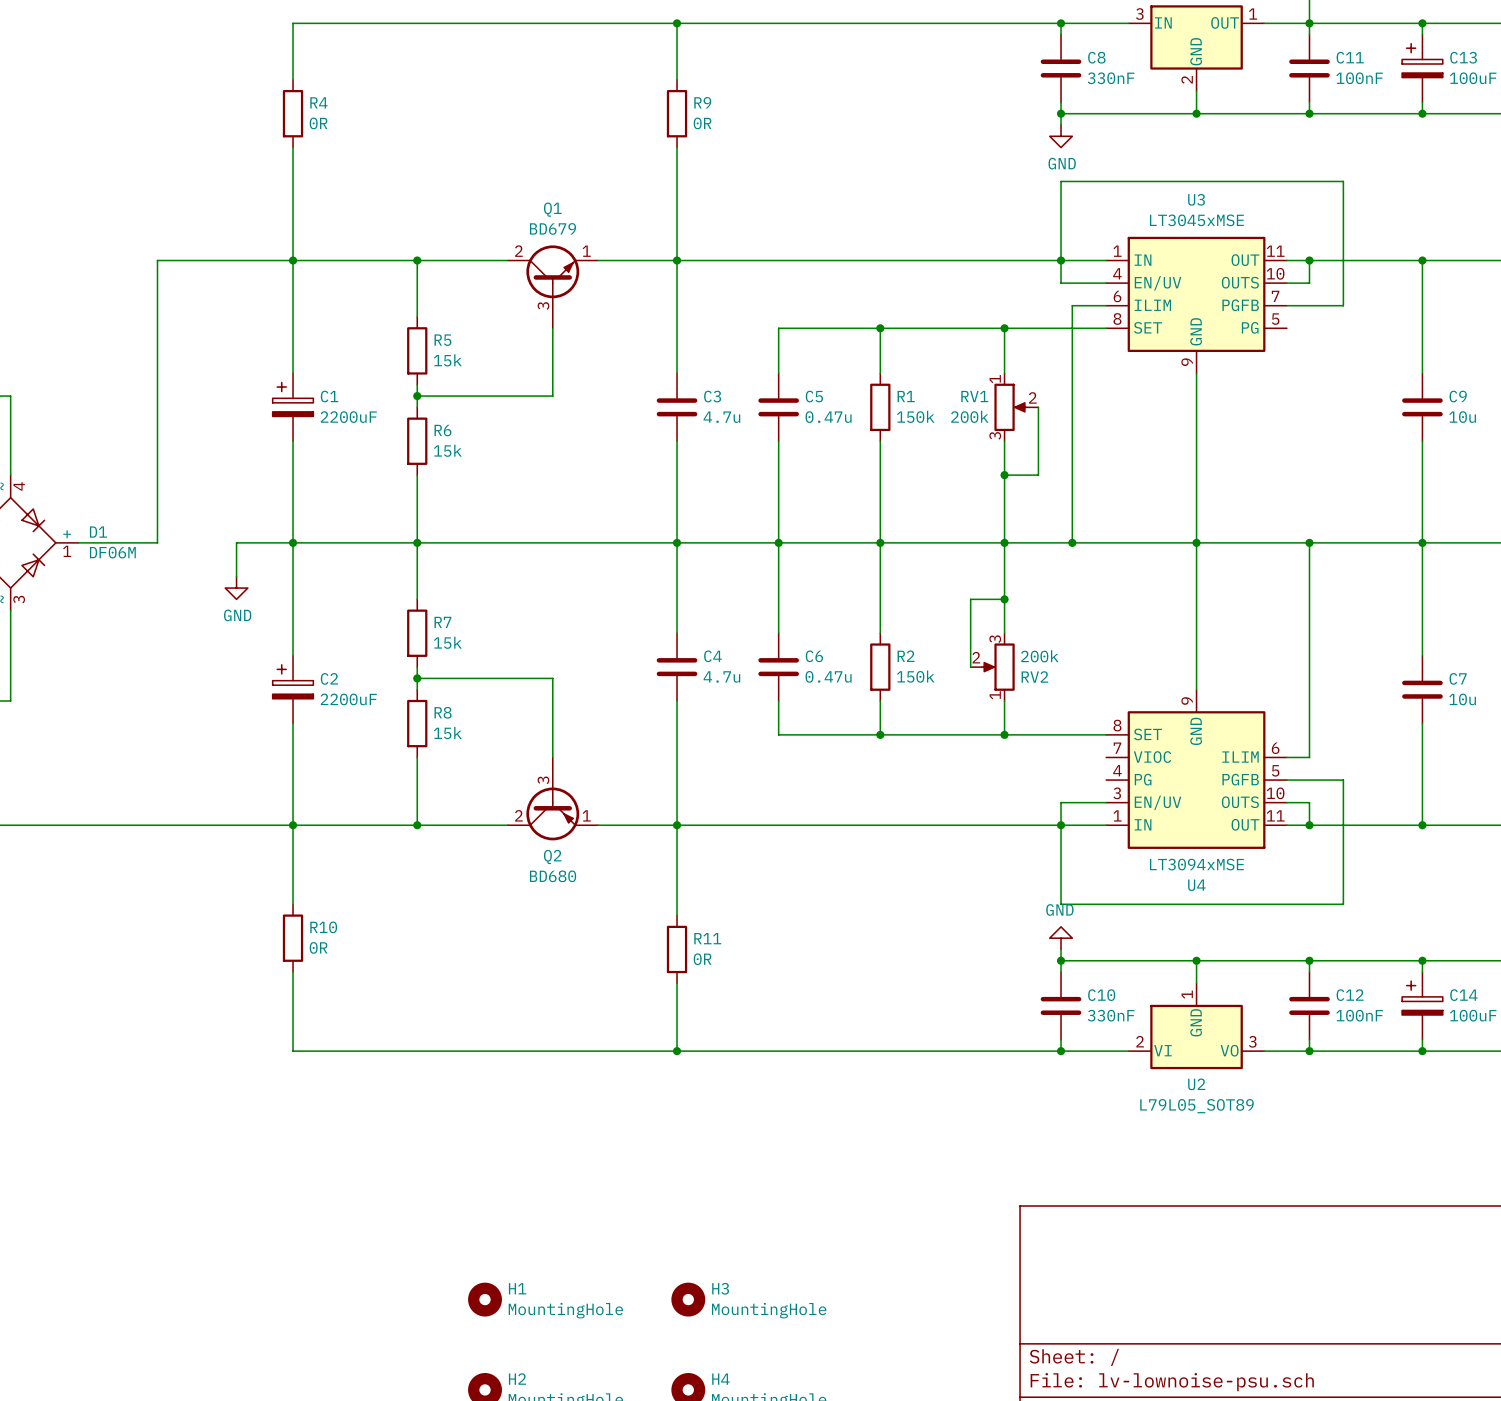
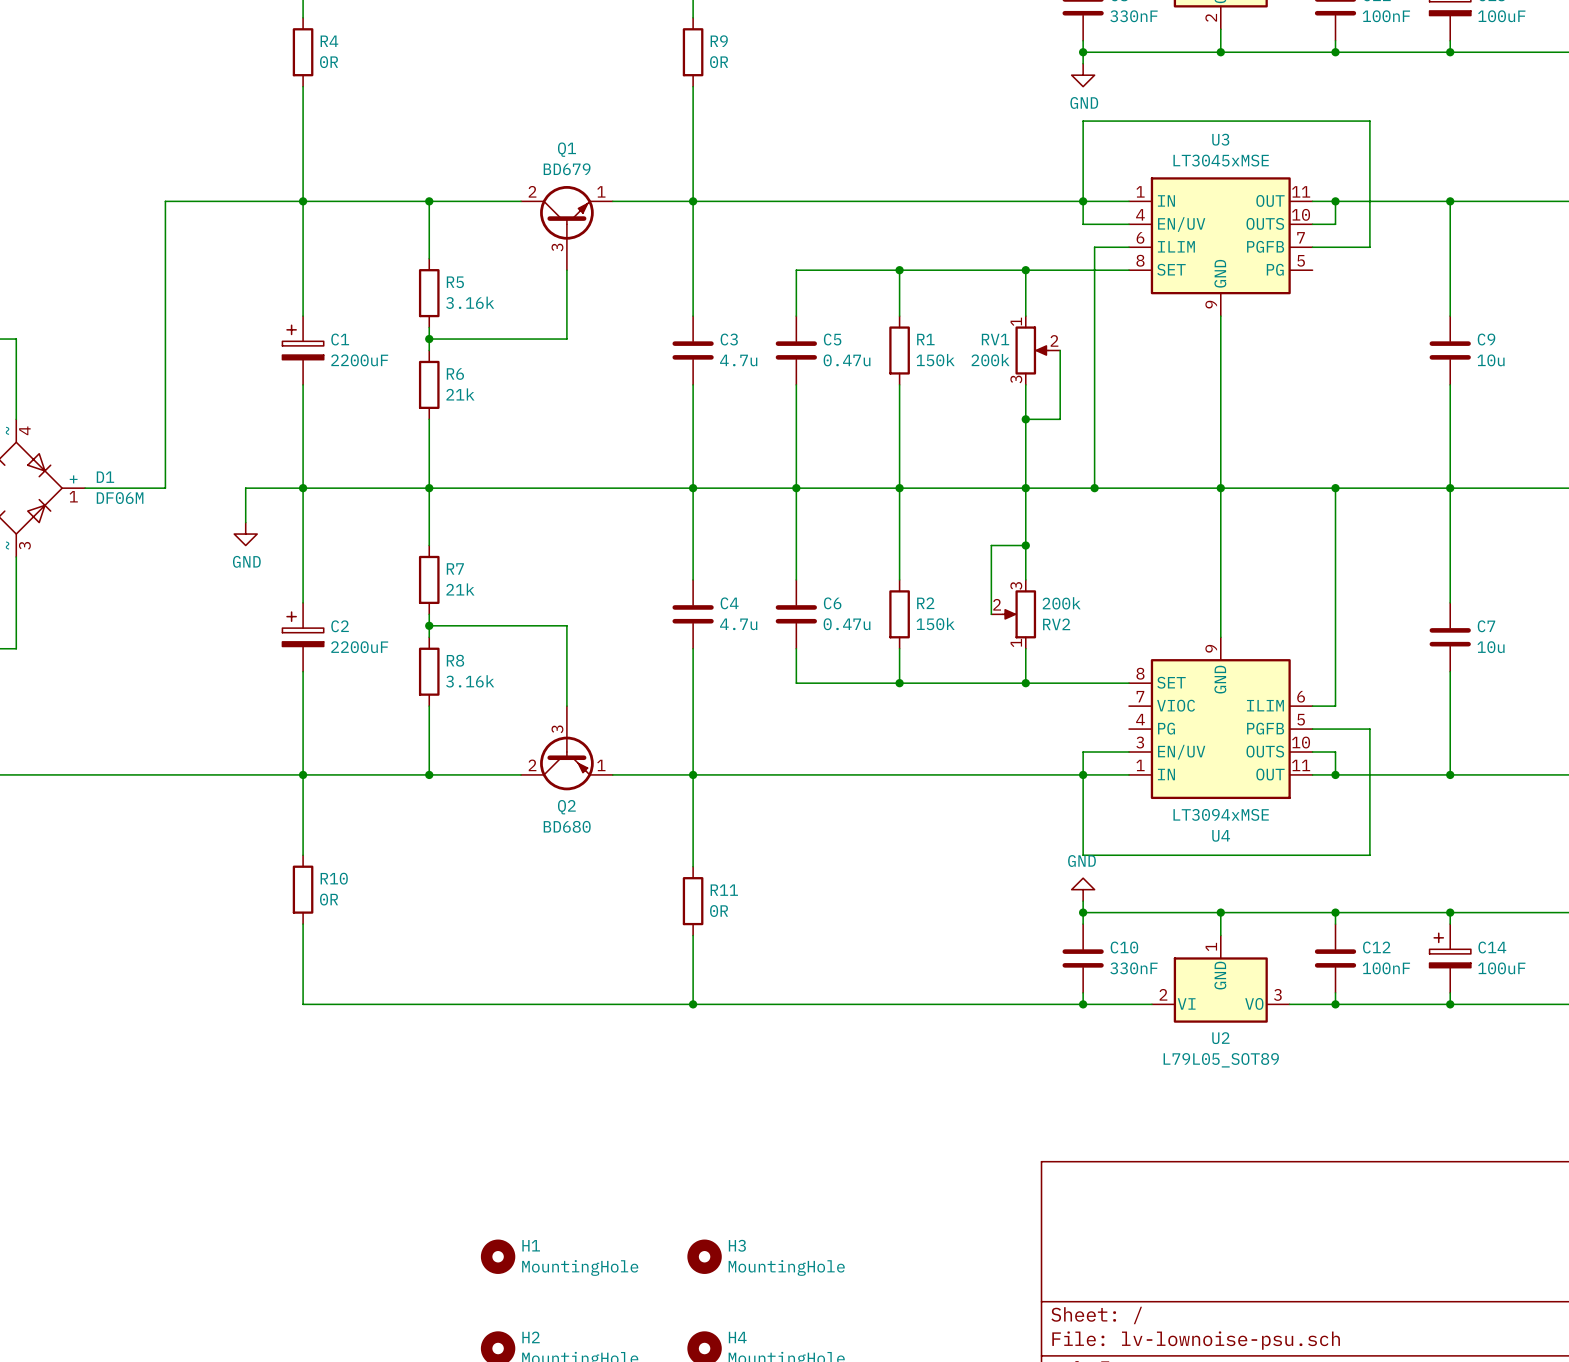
R5 value: 15k (447, 360) -> 3.16k (470, 302)
R6 value: 15k (447, 450) -> 21k (460, 394)
R7 value: 15k (447, 642) -> 21k (460, 589)
R8 value: 15k (447, 733) -> 3.16k (470, 681)

